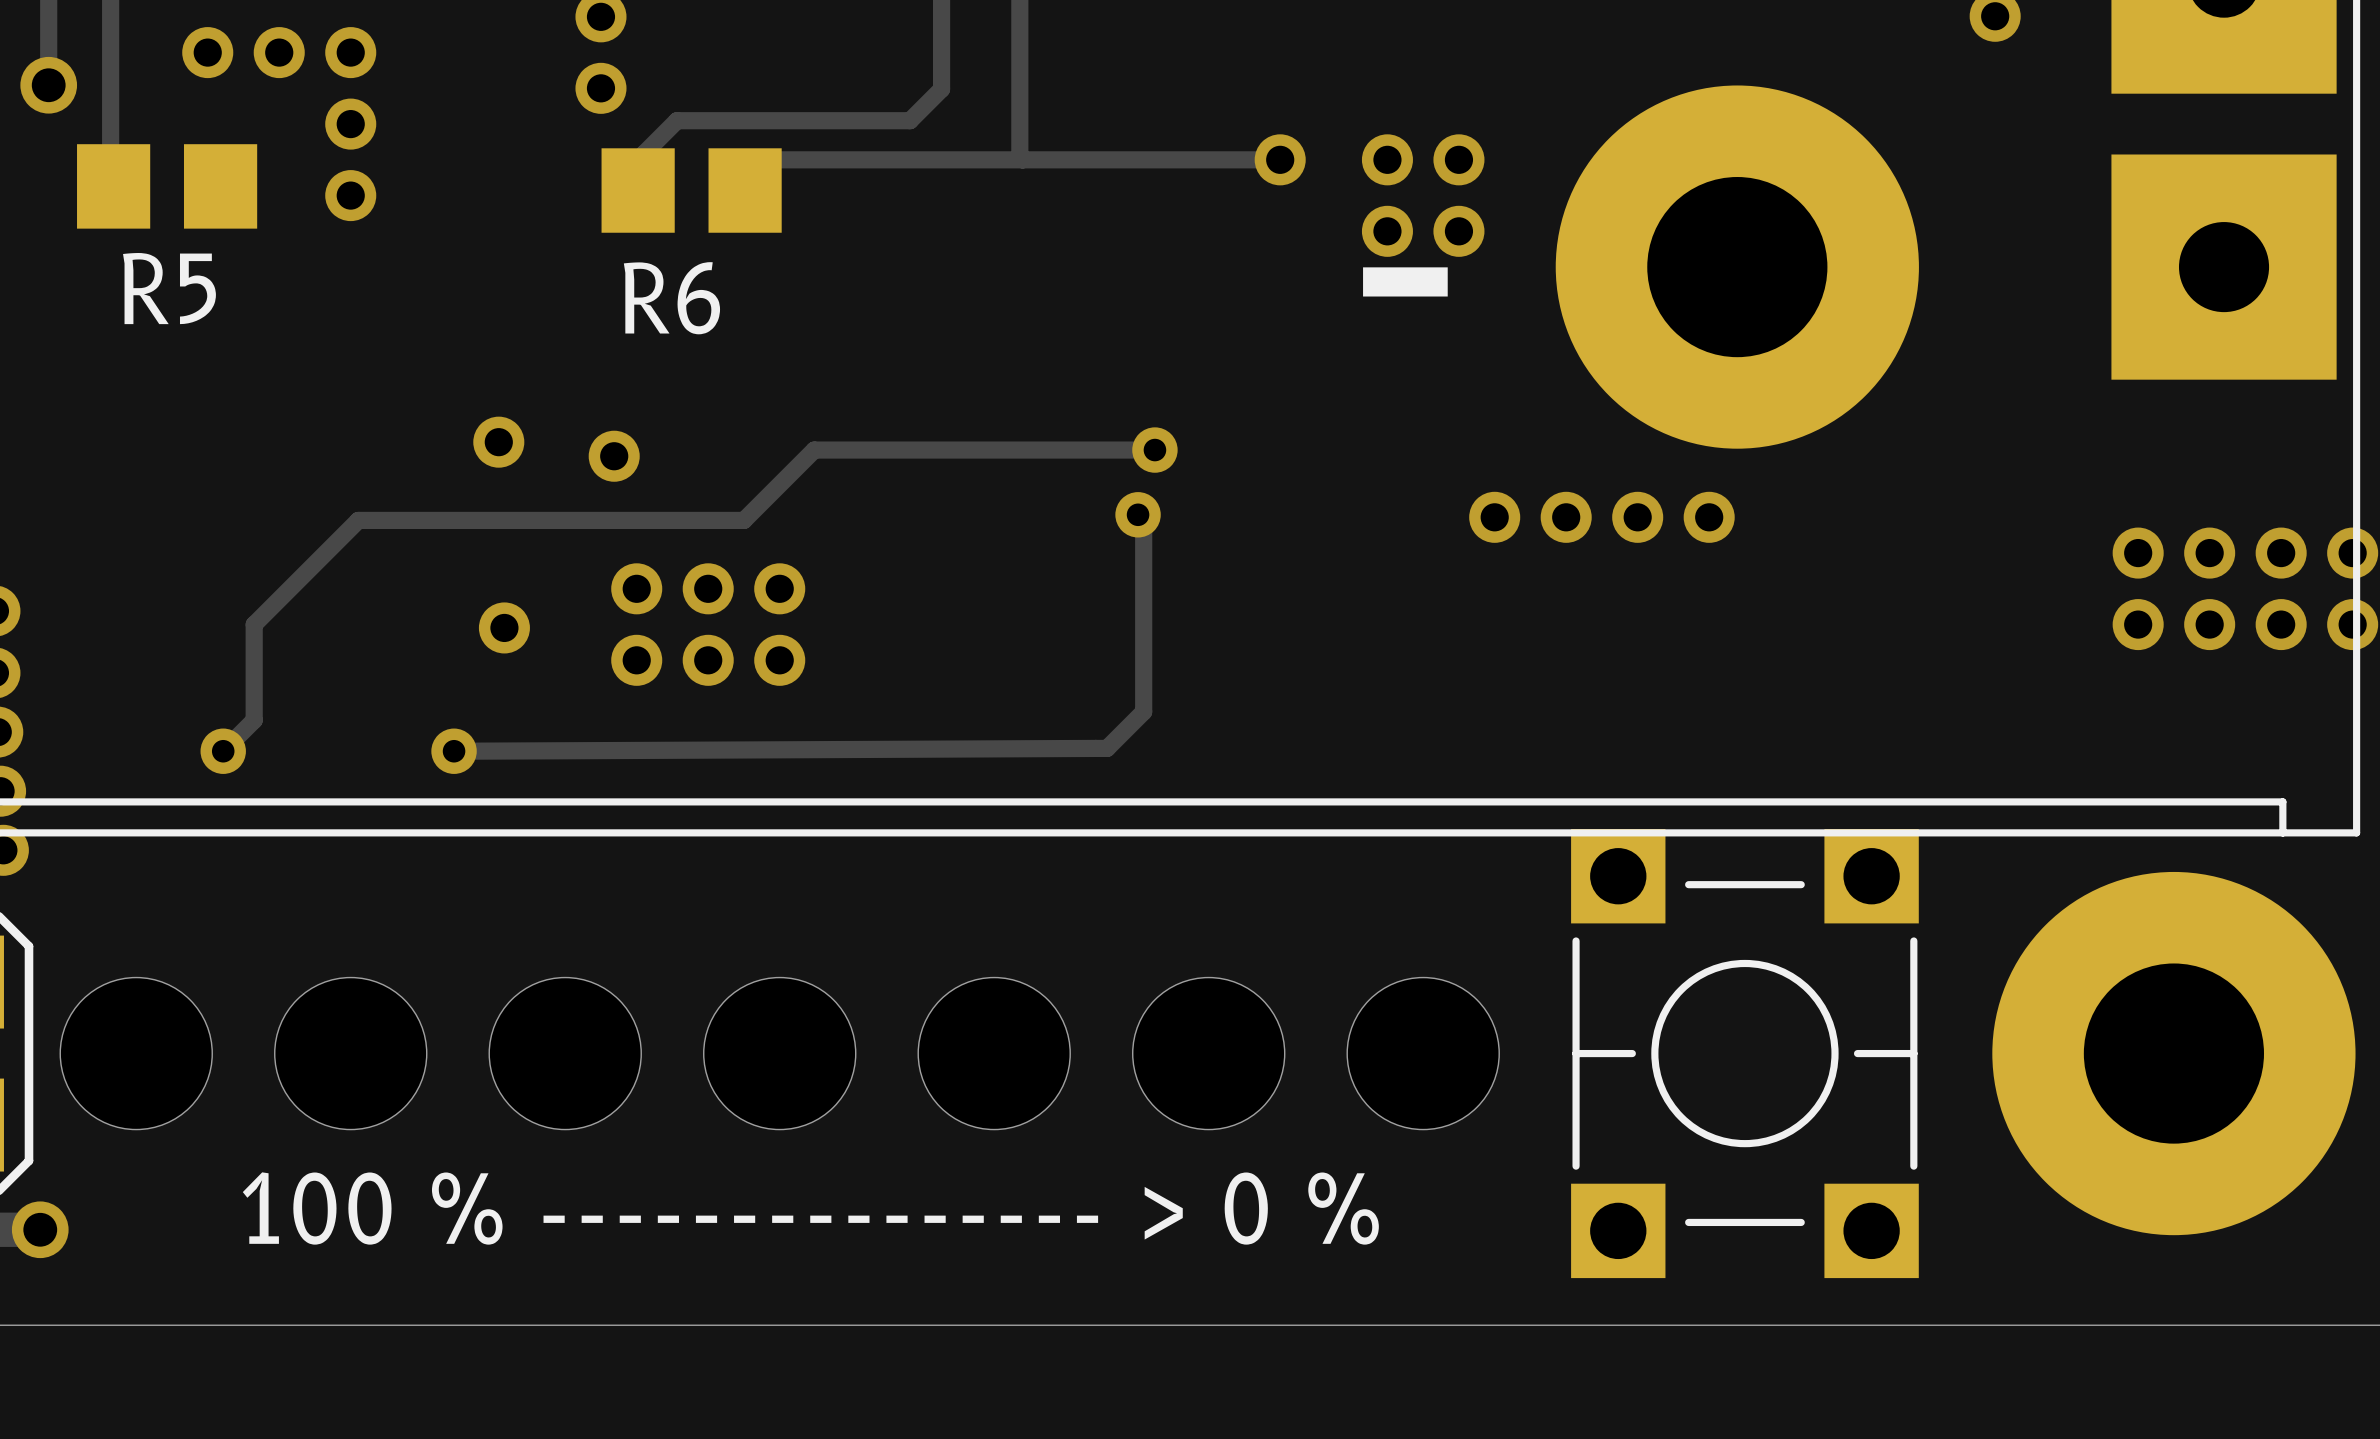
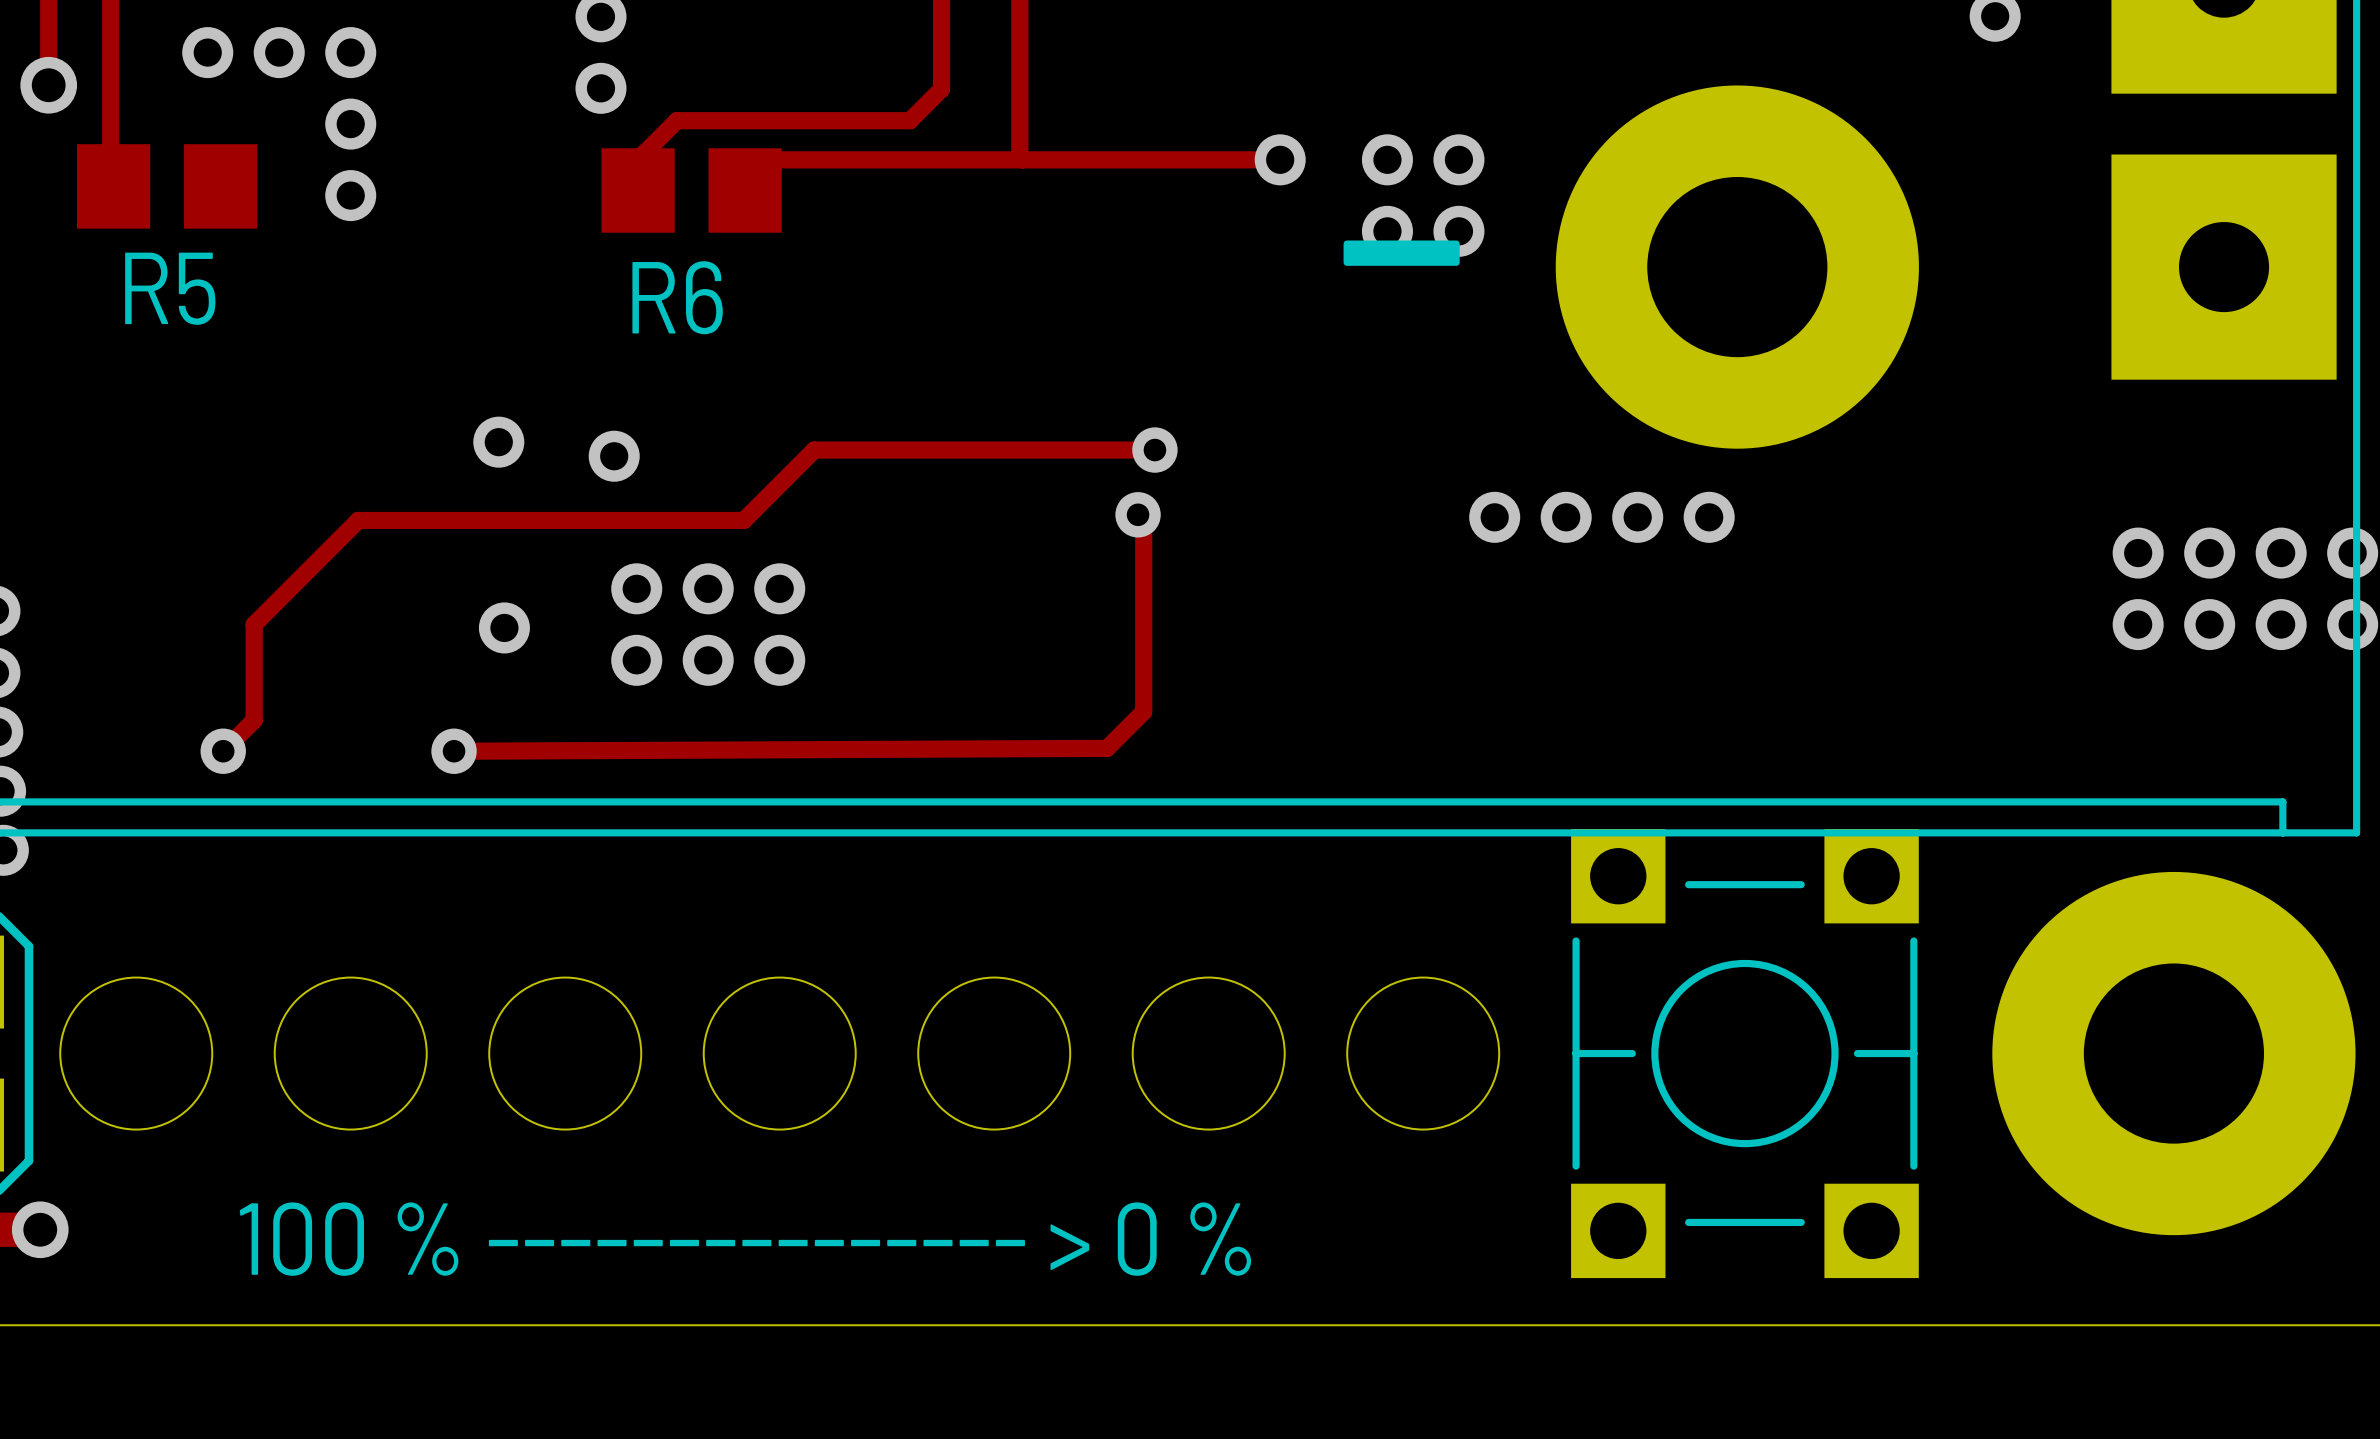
text position: 100 % --------------- > 0 % (810, 1208) -> 100 % --------------- > 0 % (745, 1239)

